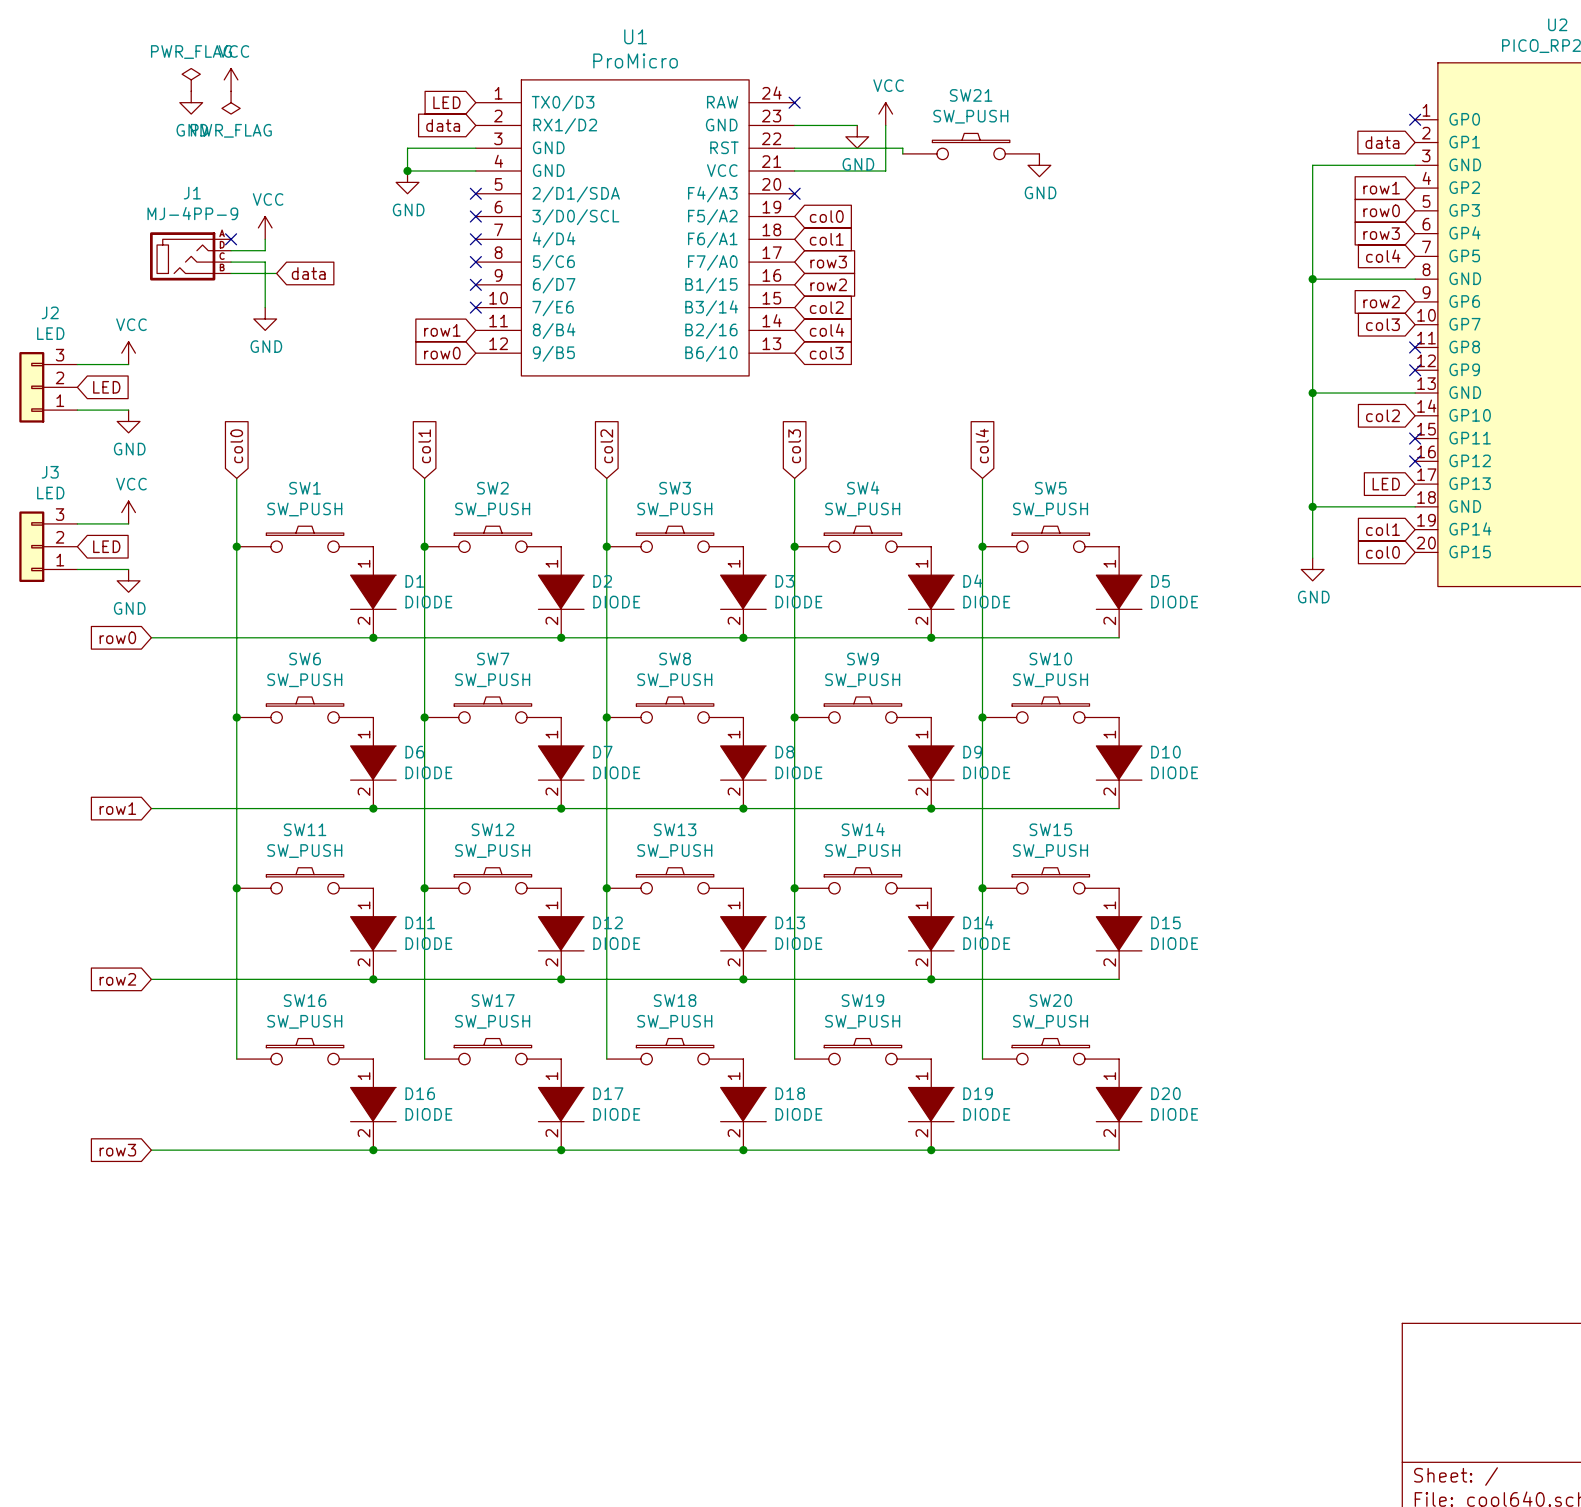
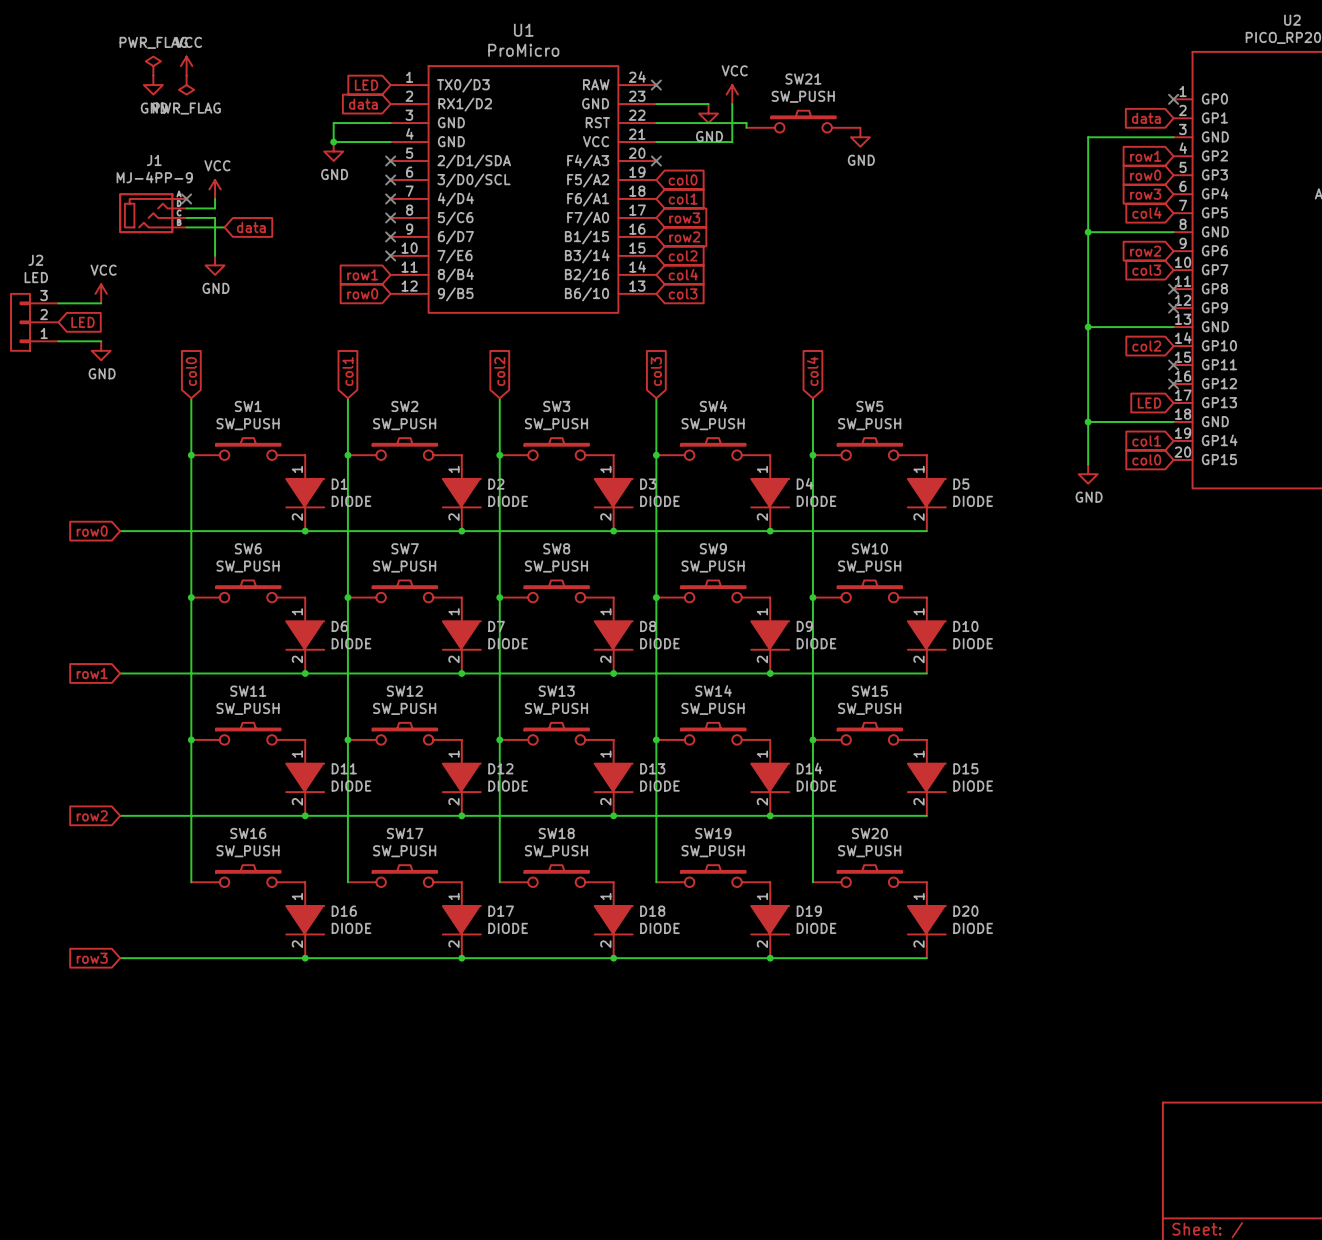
power symbol: VCC (128, 512) -> none
wire: (77, 523) (128, 523) -> none
J3: LED (48, 546) -> none
global label: LED (106, 546) -> none
wire: (77, 569) (128, 569) -> none
power symbol: GND (128, 580) -> none

